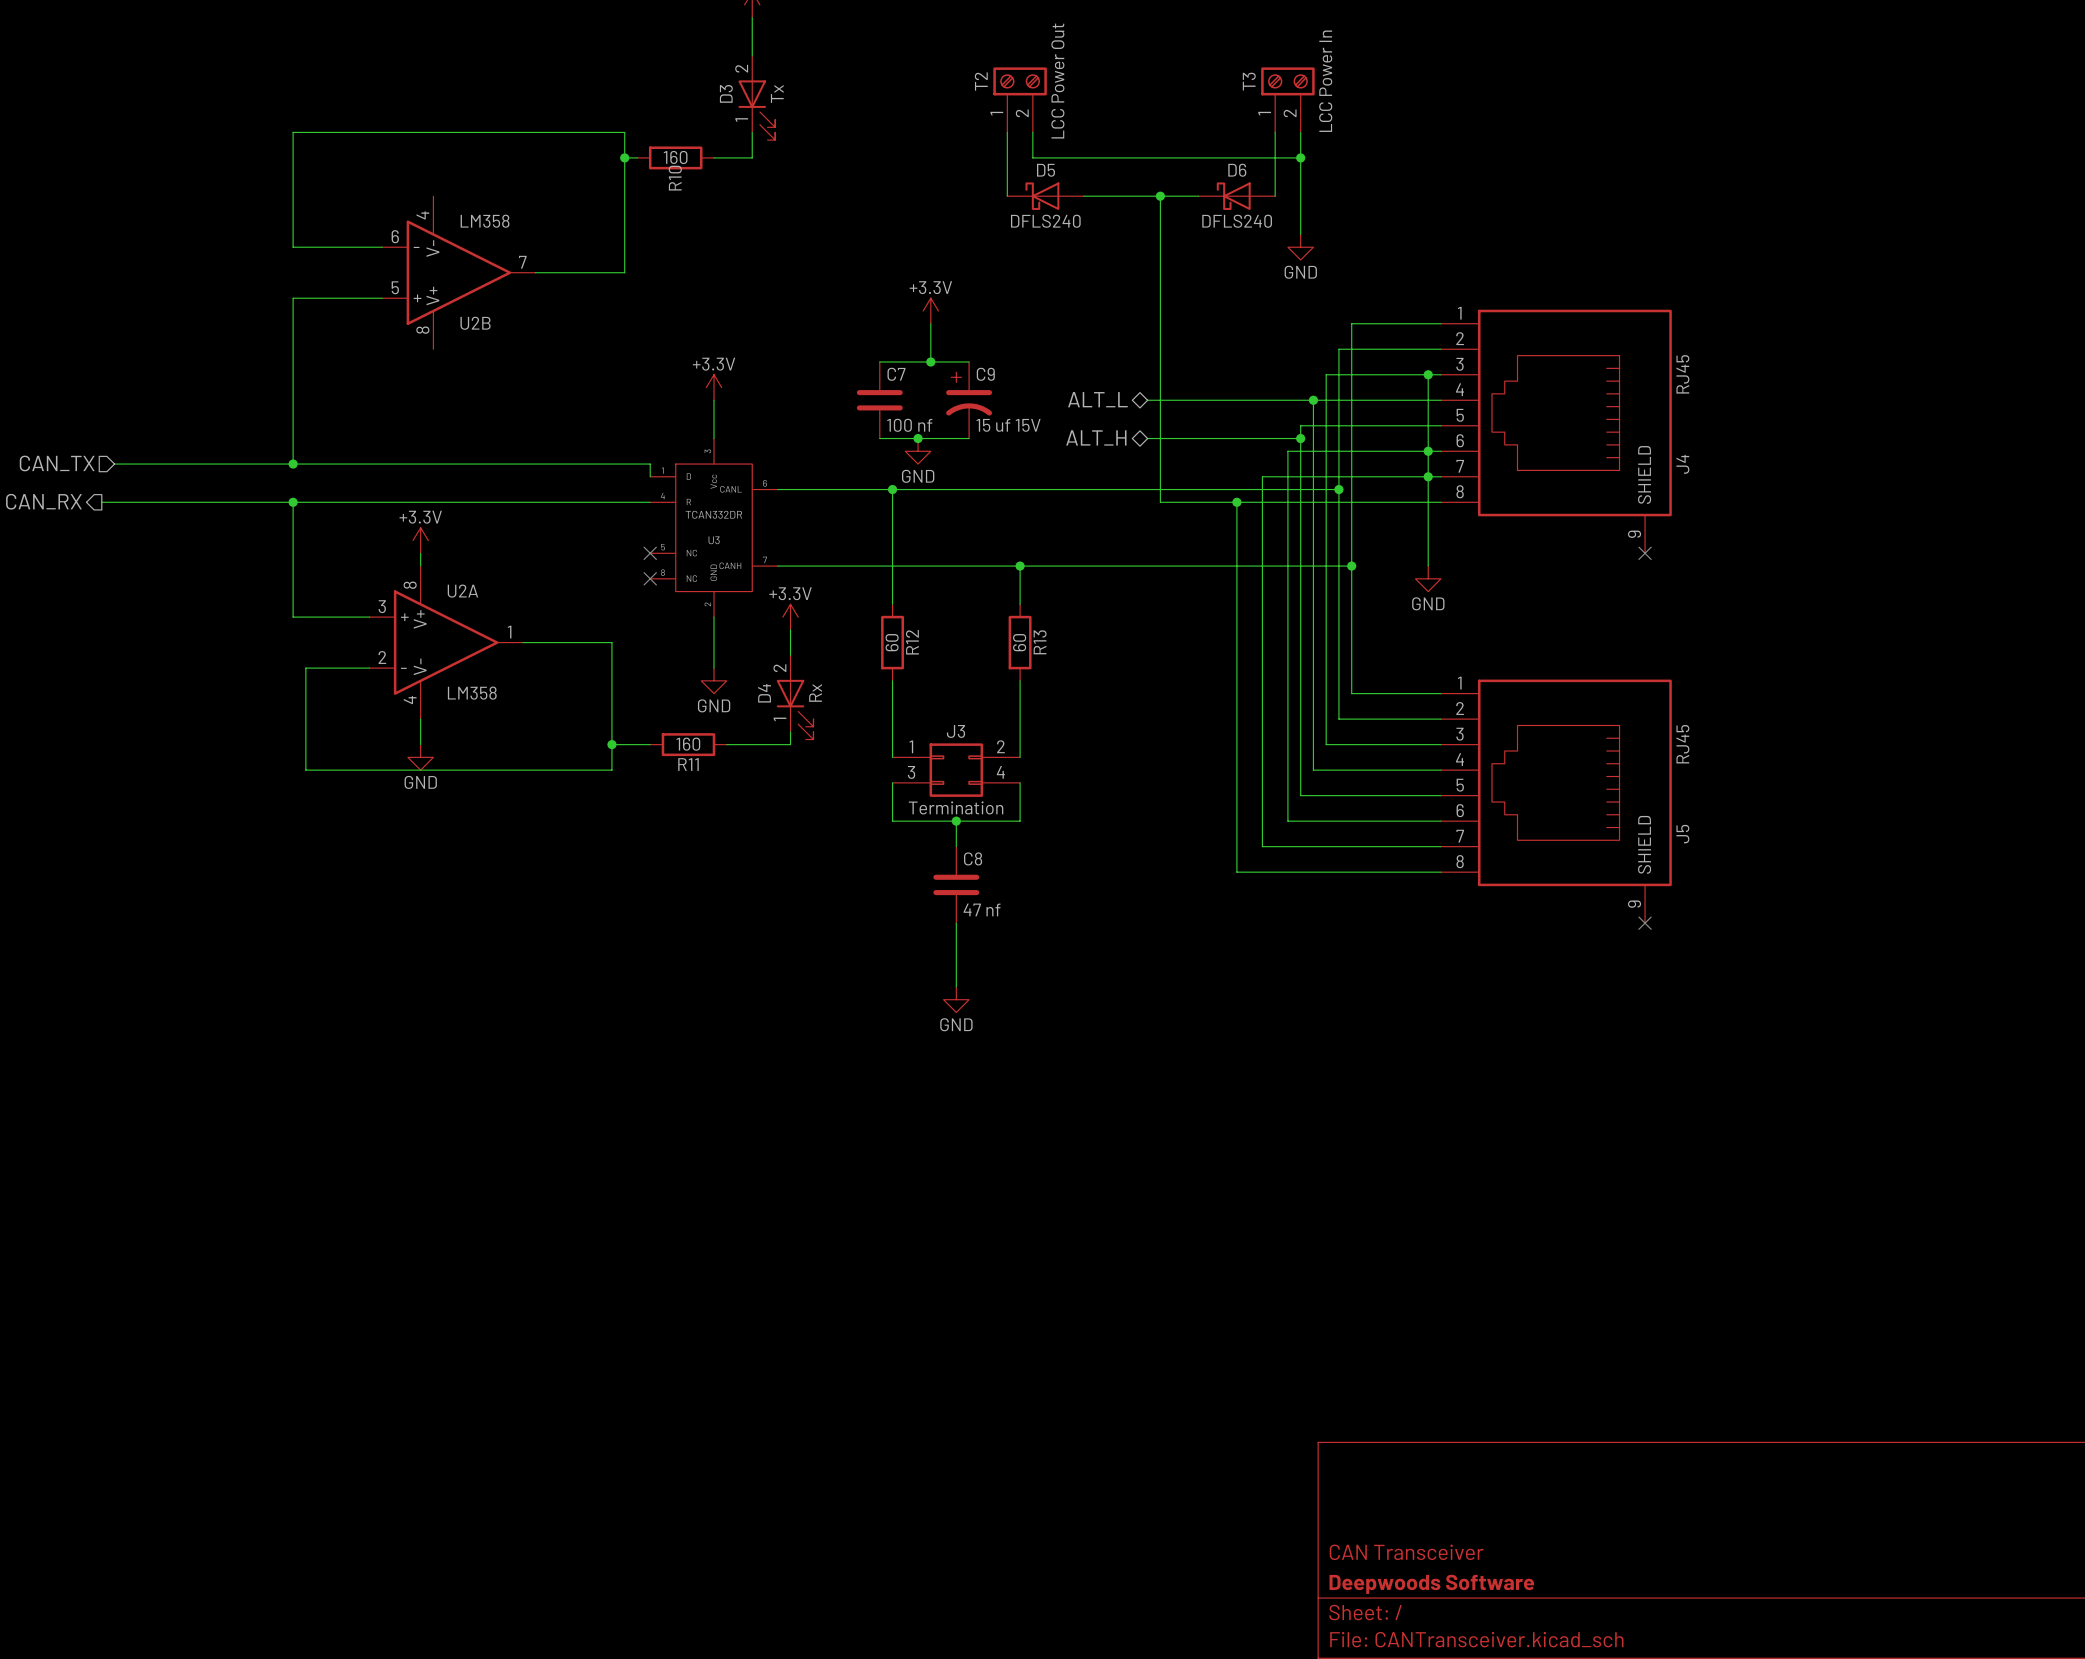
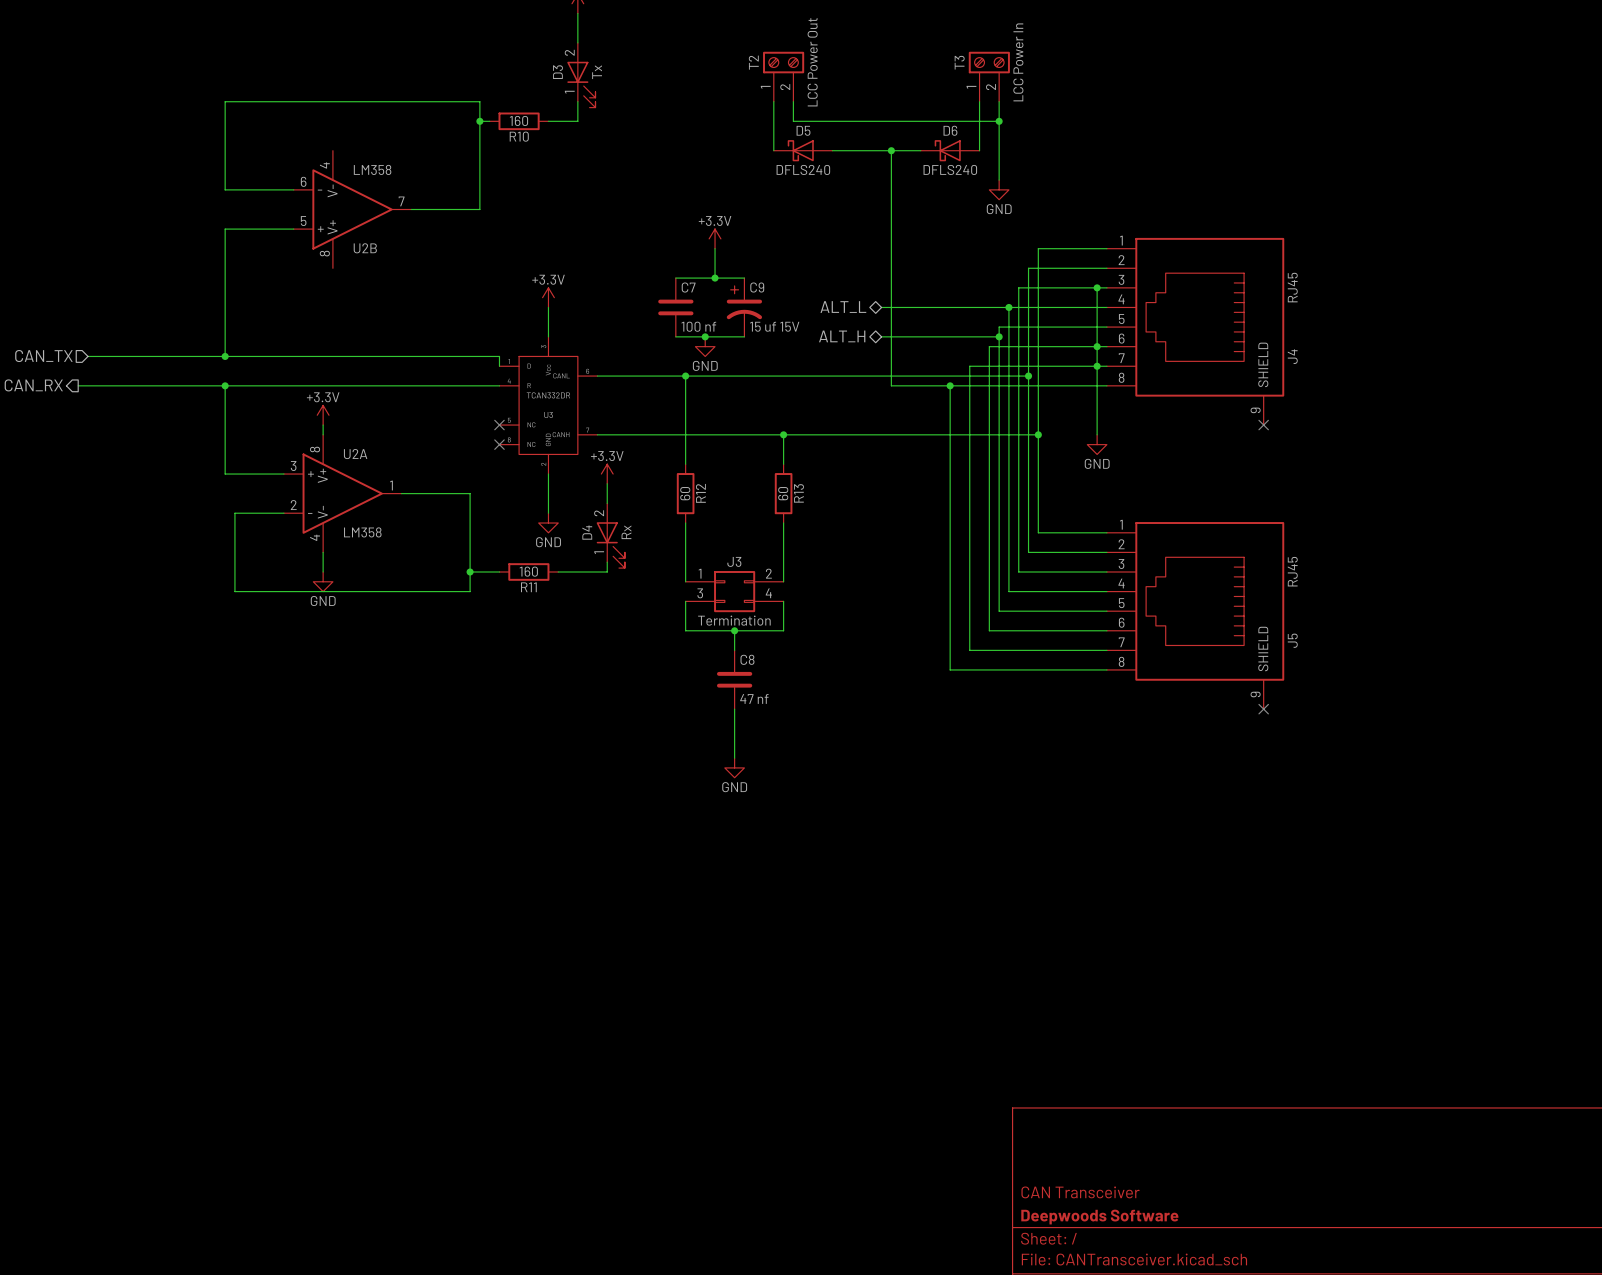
R10 name rotation: 0° (675, 178) -> 90° clockwise (519, 136)

